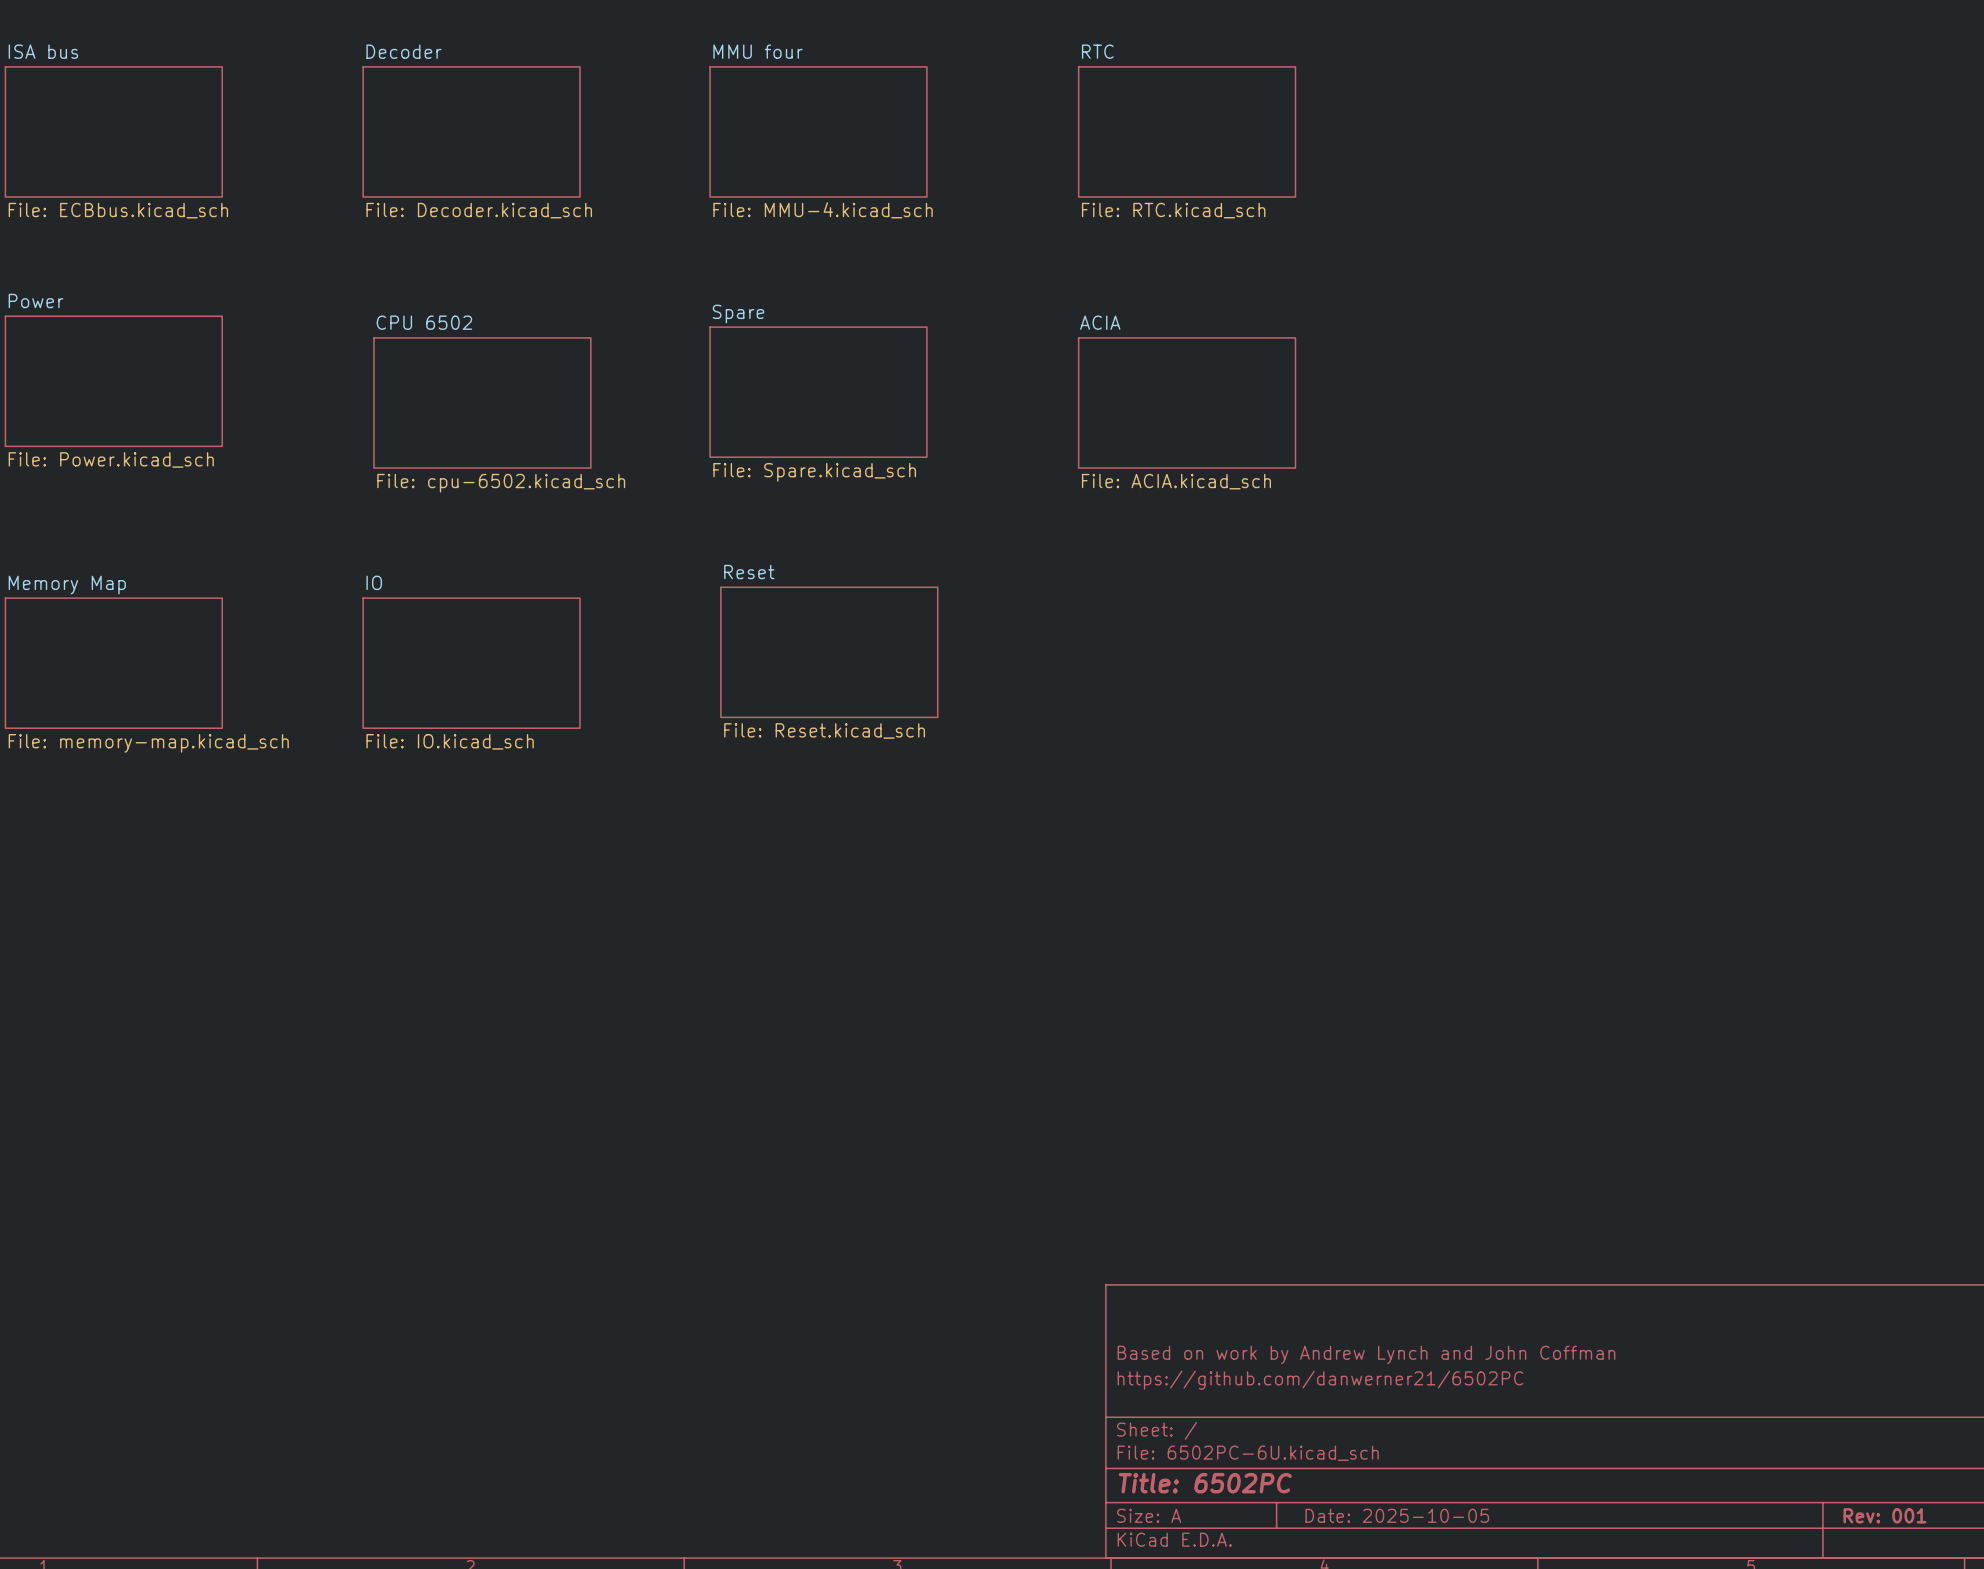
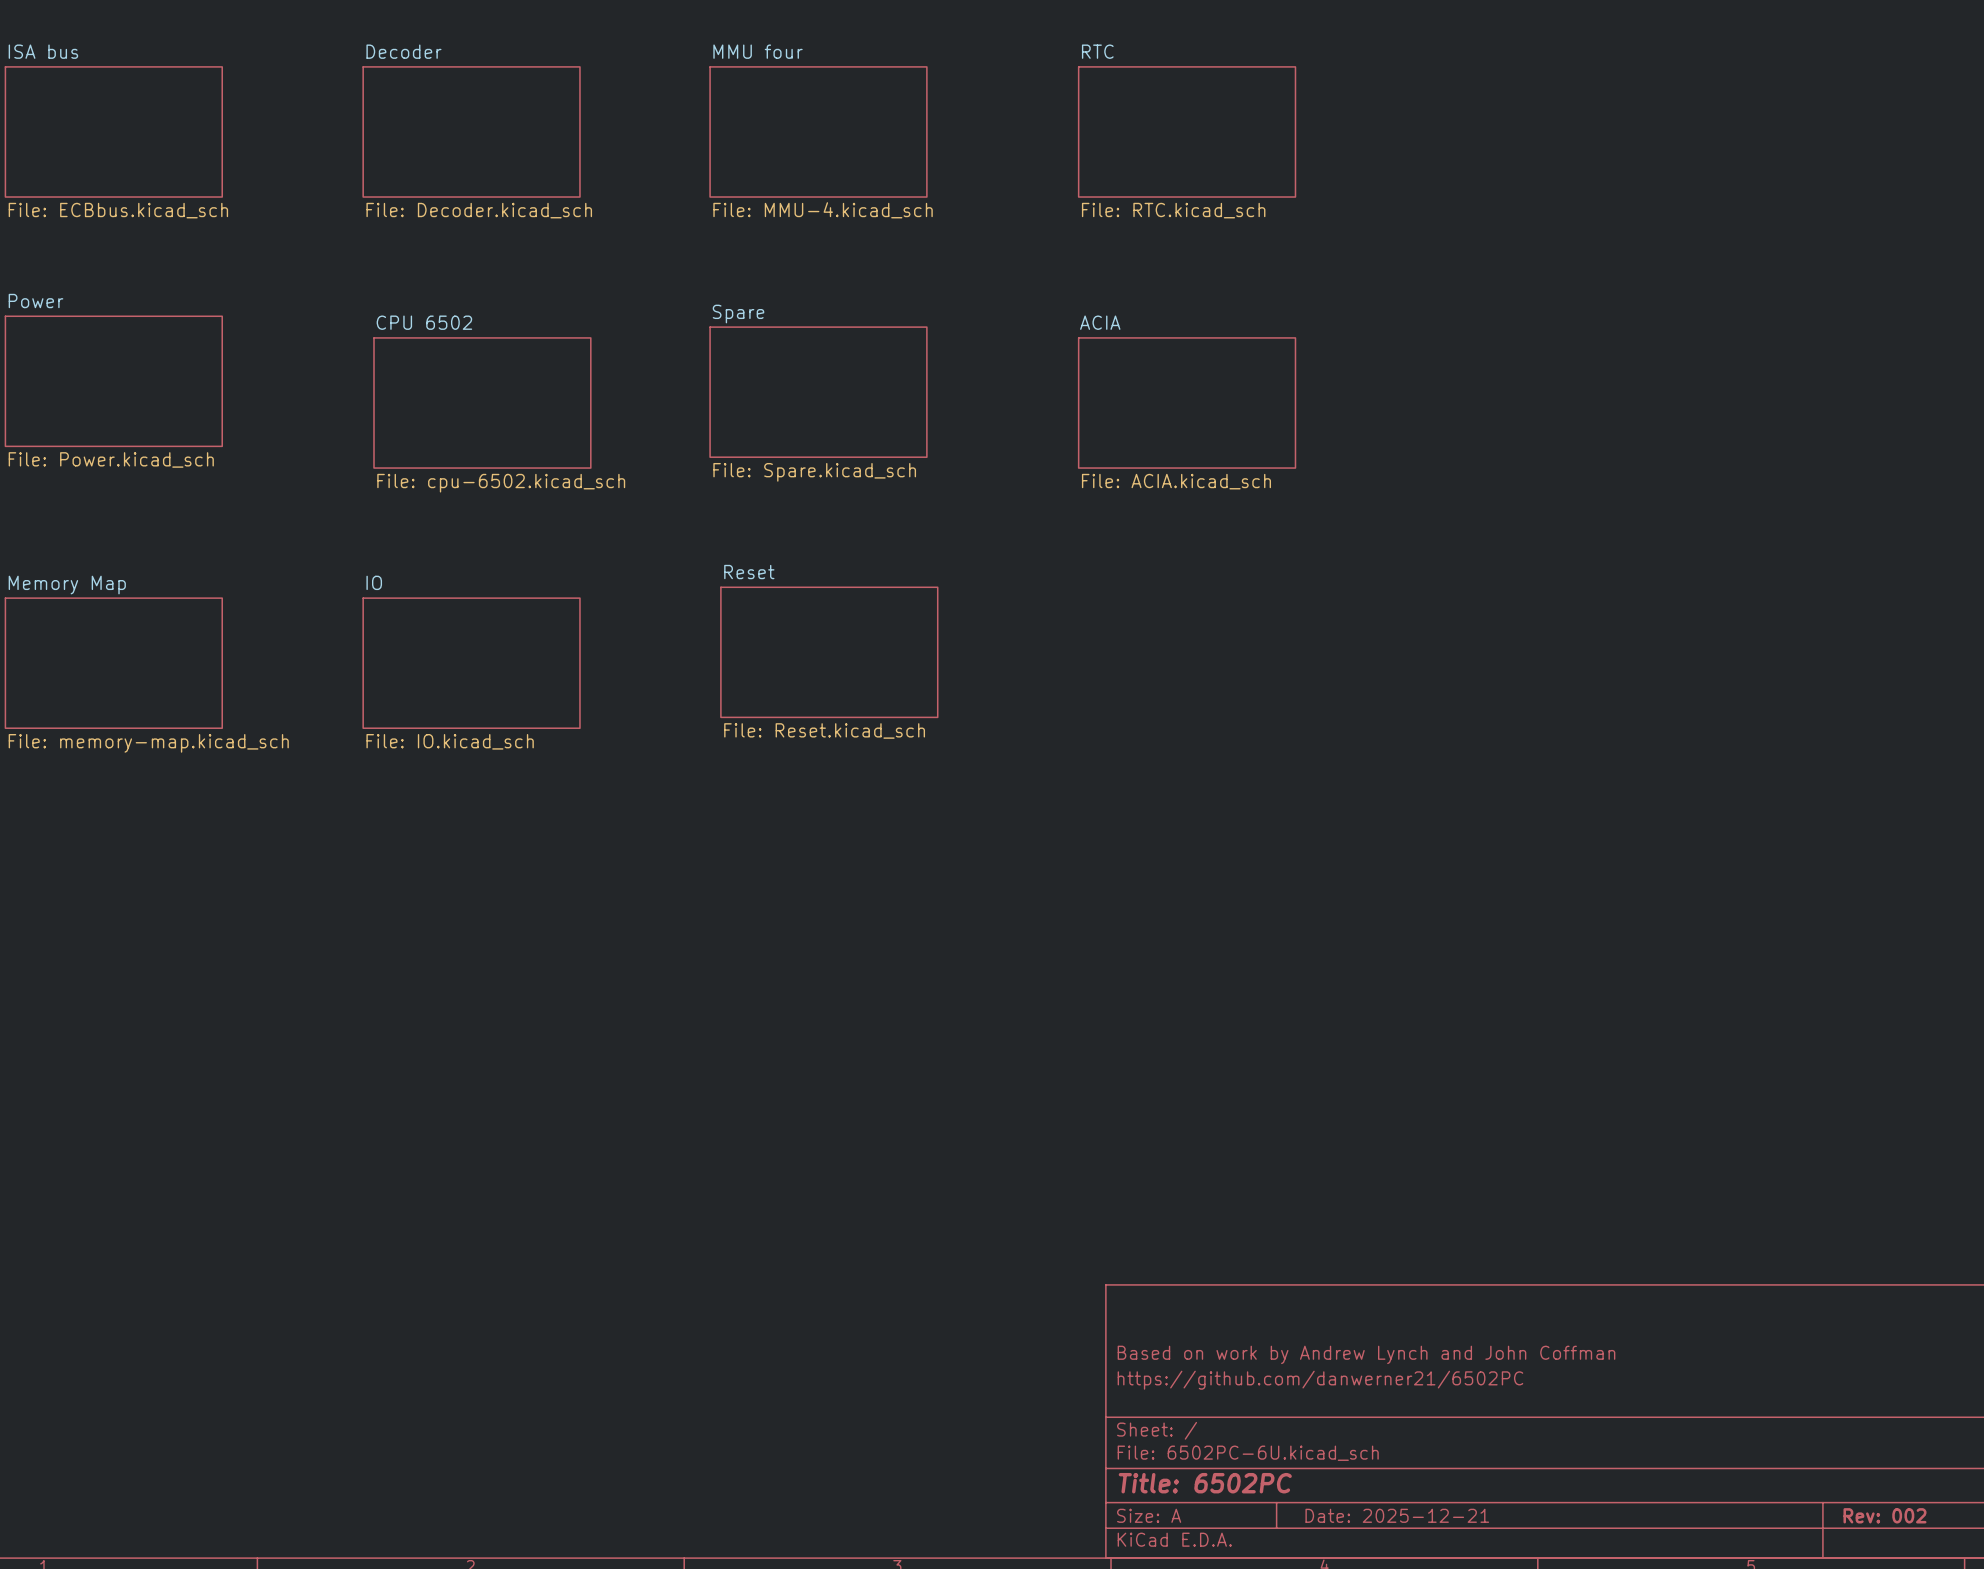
title block: Date: 2025-10-05 (1397, 1515) -> Date: 2025-12-21 (1397, 1515)
title block: Rev: 001 (1884, 1515) -> Rev: 002 (1884, 1515)

